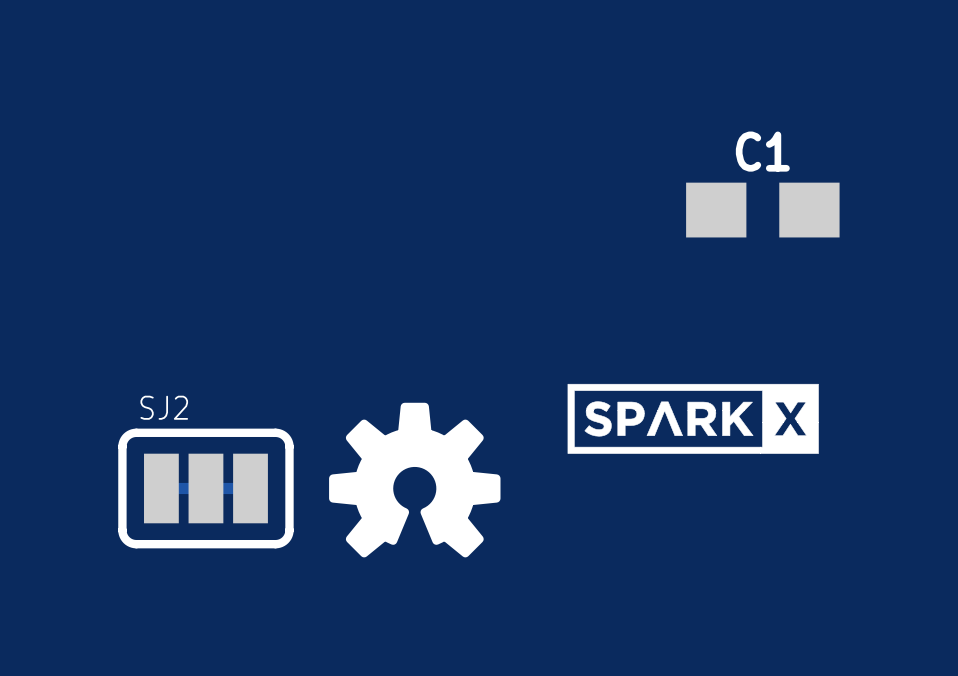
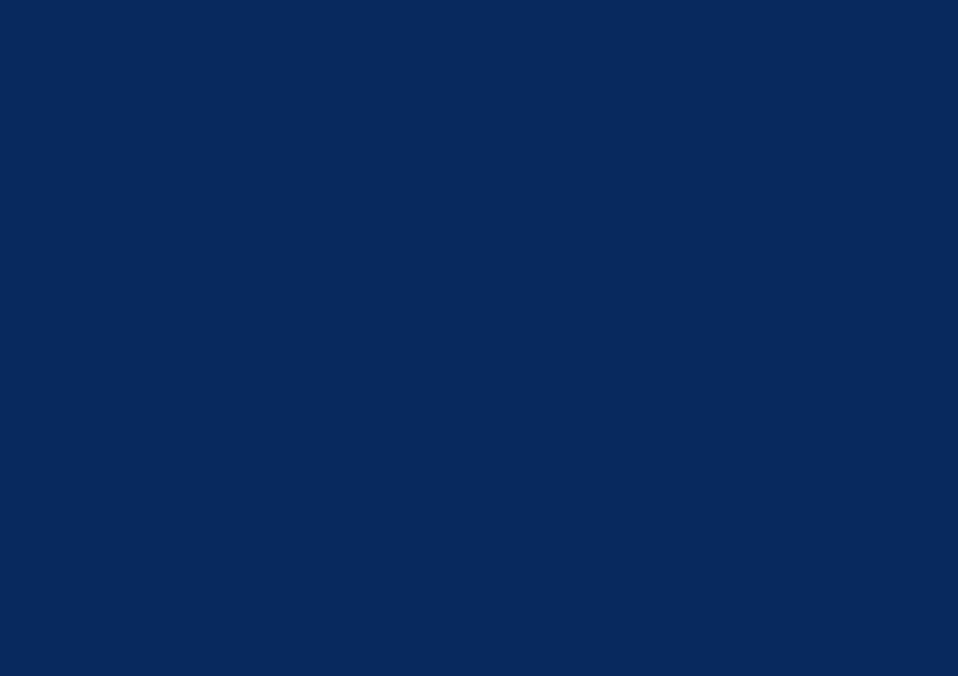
C1: (762, 210) -> none
drawing: [567, 383, 819, 454] -> none
drawing: [329, 402, 501, 558] -> none
SJ2: (205, 488) -> none

